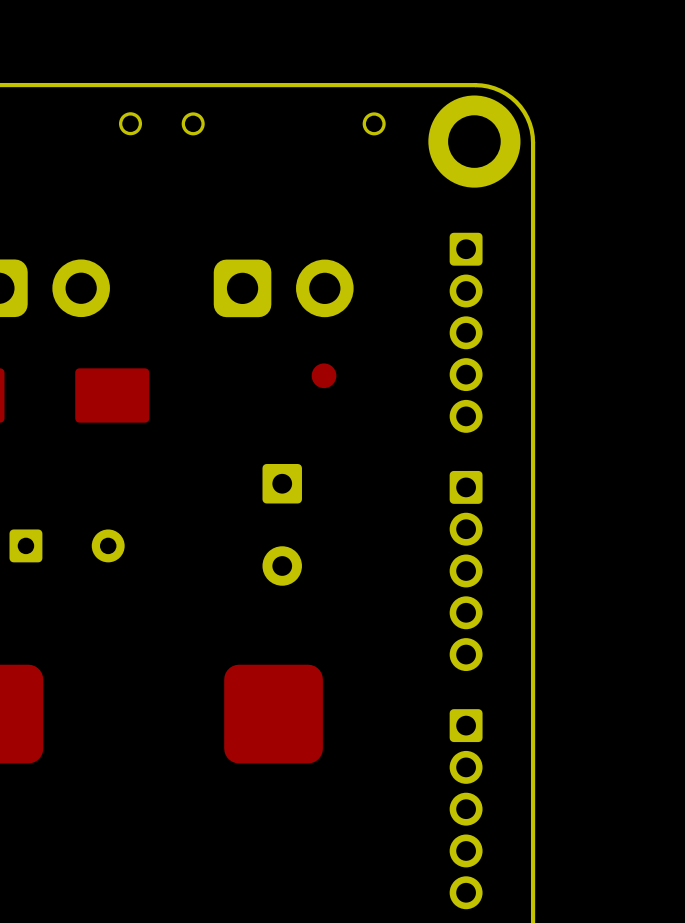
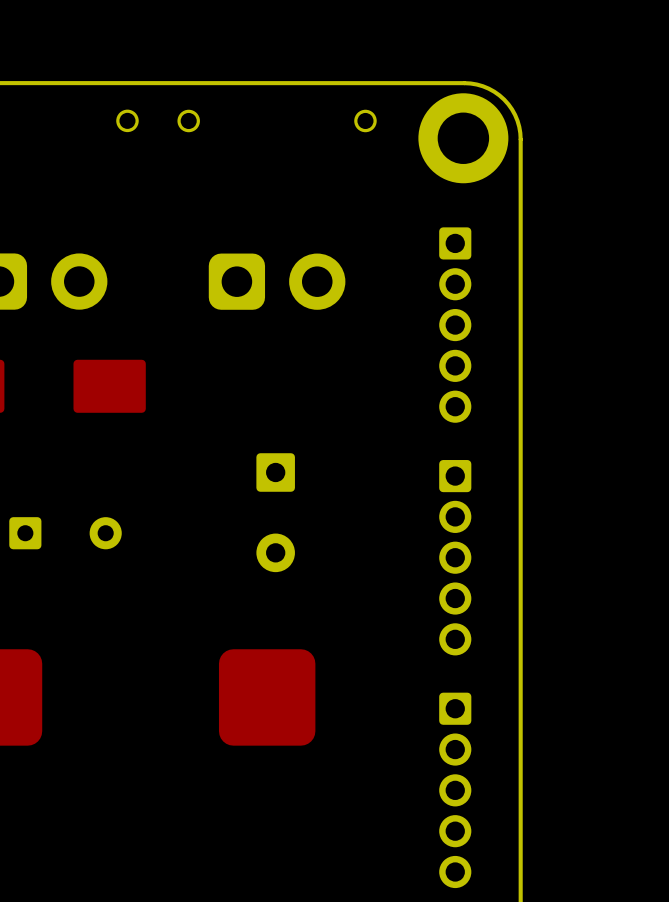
part: (324, 375) -> none

